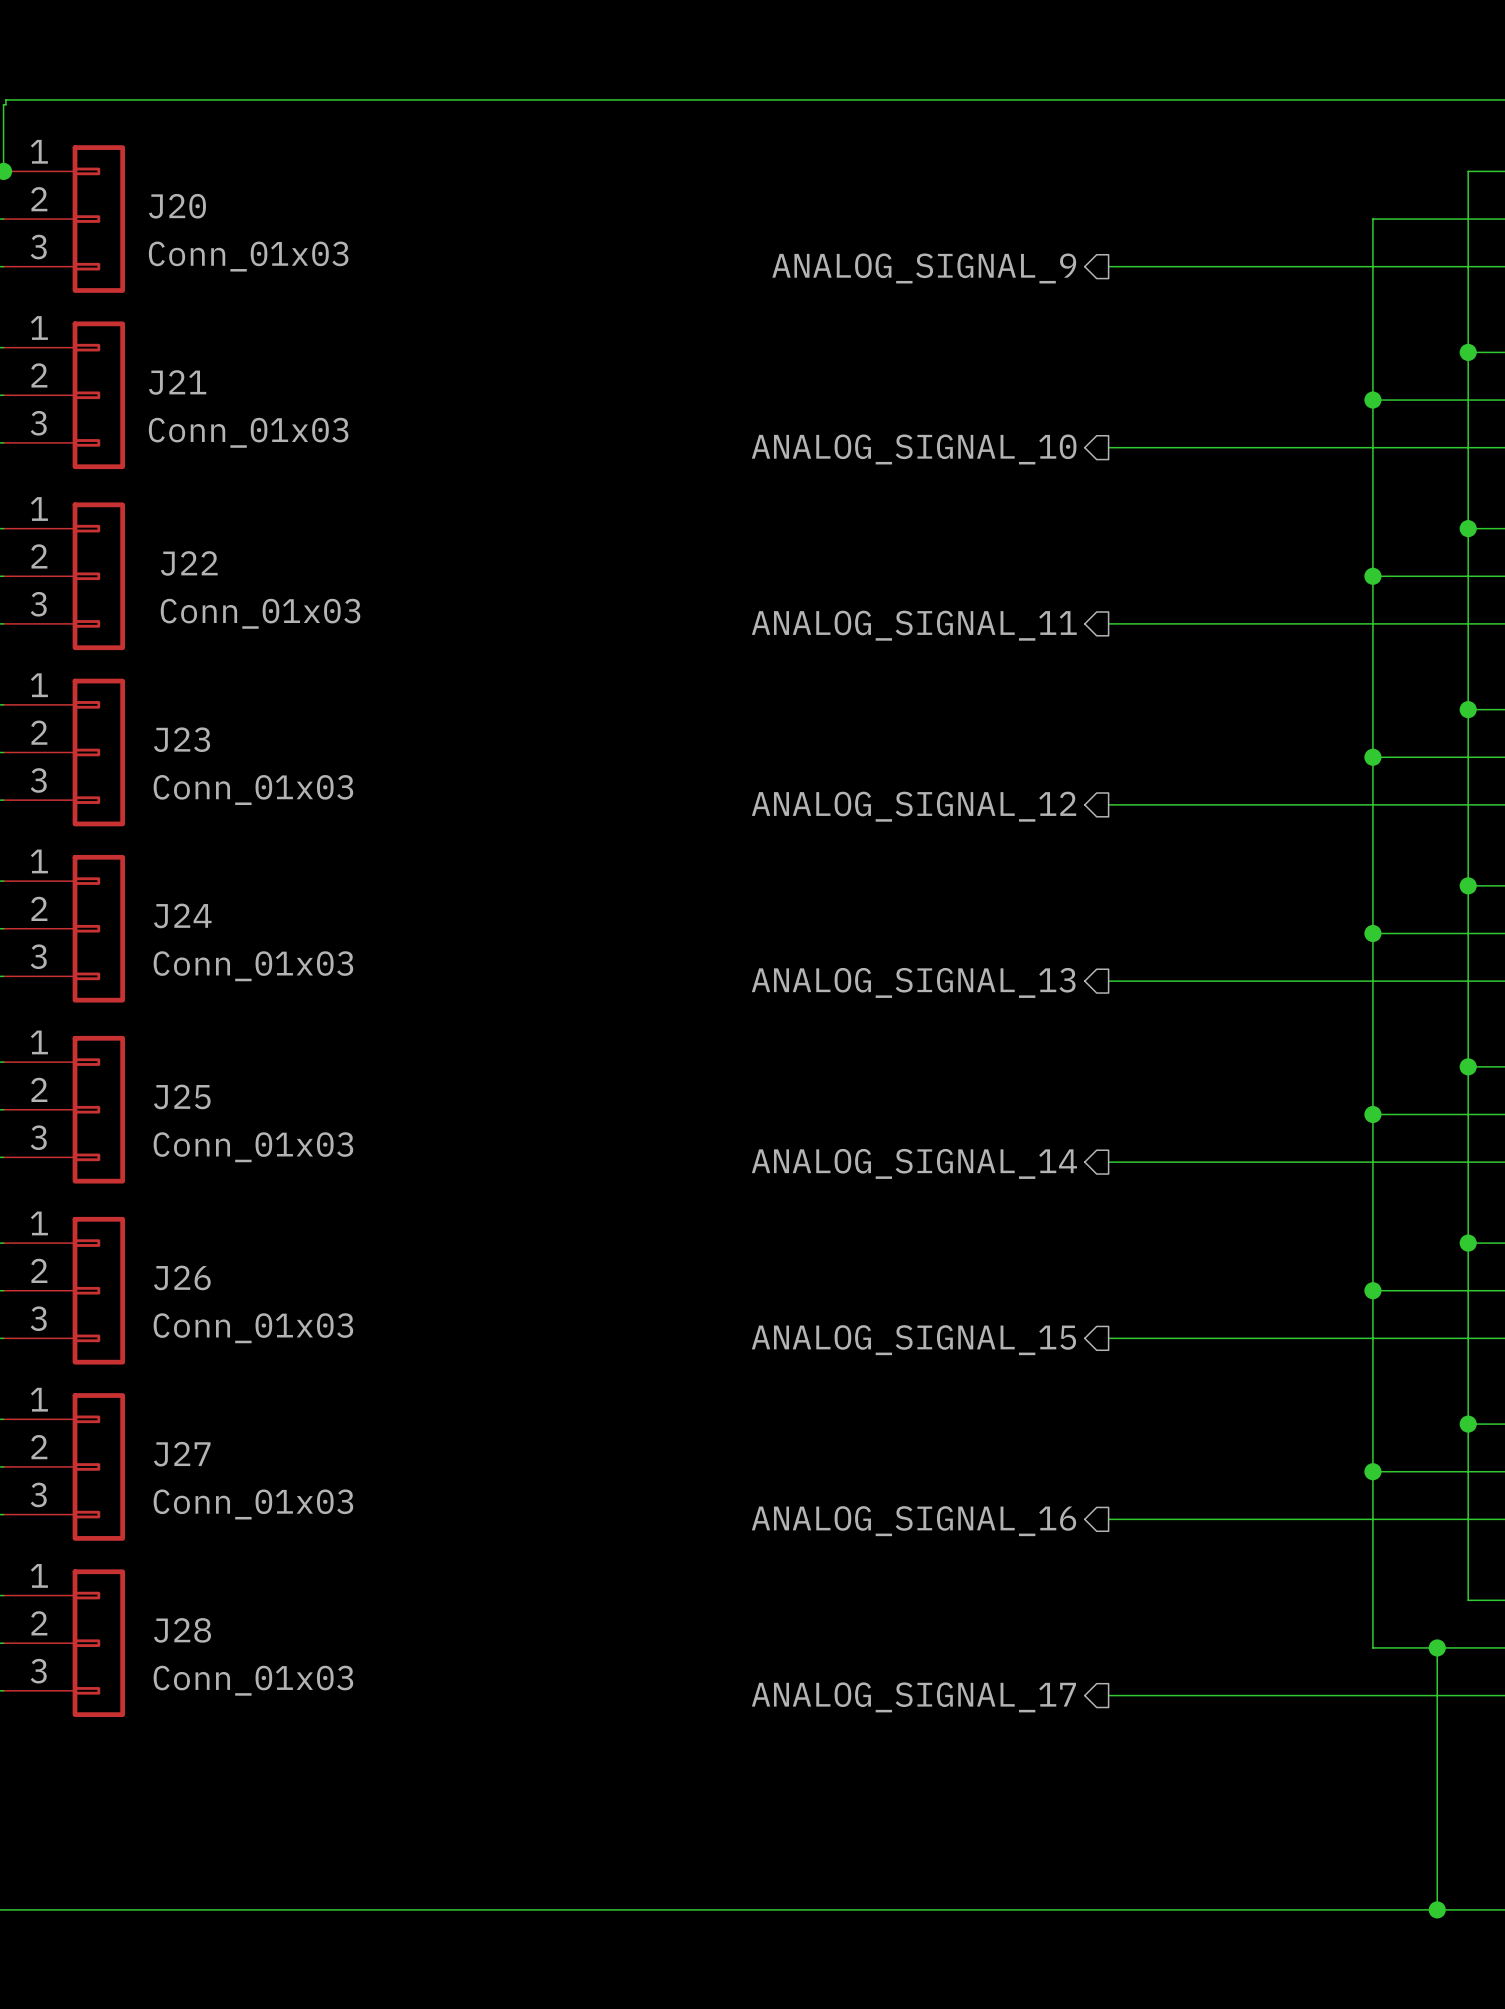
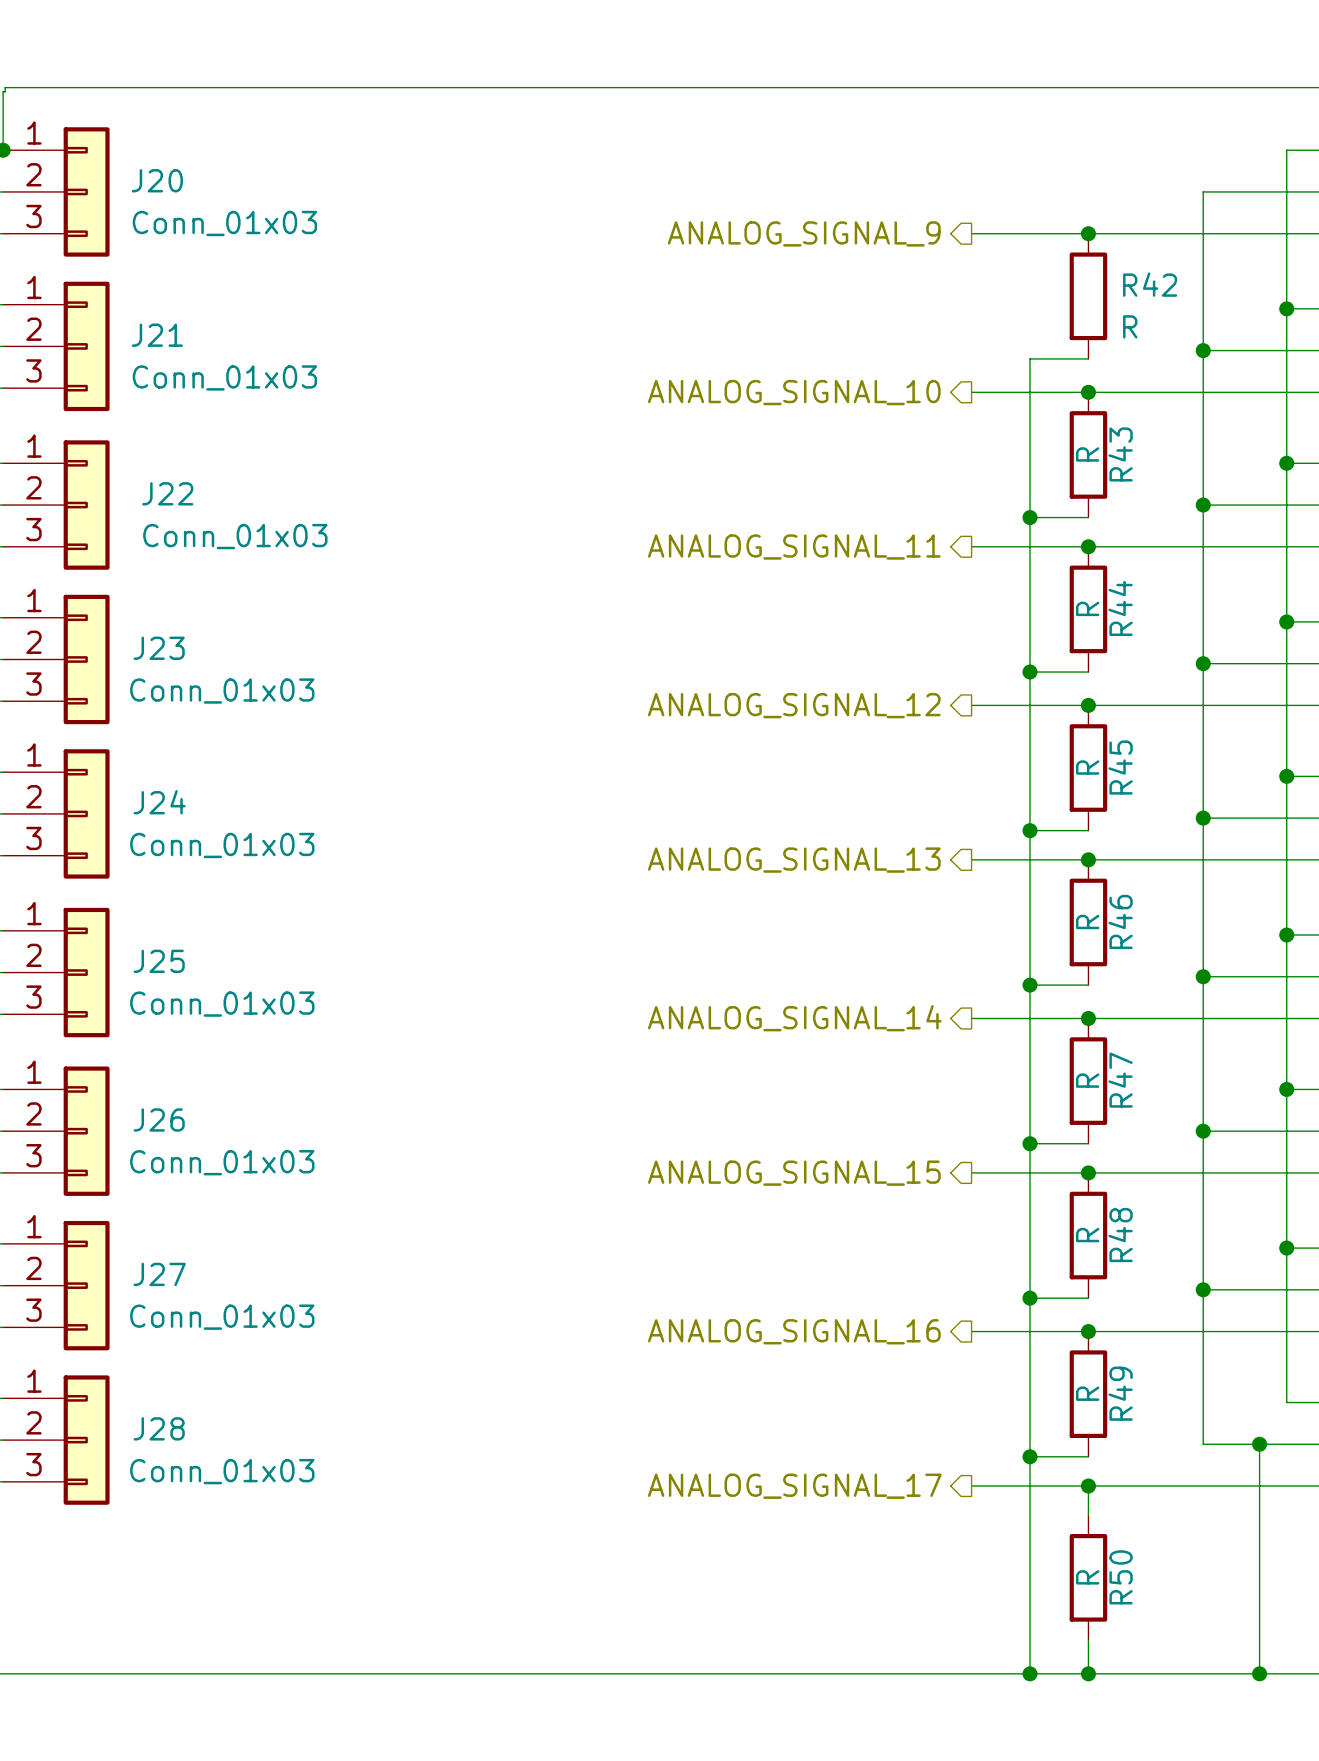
junction: none -> (1088, 233)
R42: none -> R (1088, 296)
wire: none -> (1088, 358) (1030, 358) (1030, 1673)
junction: none -> (1088, 392)
R43: none -> R (1088, 454)
wire: none -> (1030, 517) (1088, 517)
junction: none -> (1030, 517)
junction: none -> (1088, 546)
R44: none -> R (1088, 609)
wire: none -> (1030, 672) (1088, 672)
junction: none -> (1030, 672)
junction: none -> (1088, 705)
R45: none -> R (1088, 768)
wire: none -> (1030, 830) (1088, 830)
junction: none -> (1030, 830)
junction: none -> (1088, 859)
R46: none -> R (1088, 922)
wire: none -> (1030, 985) (1088, 985)
junction: none -> (1030, 985)
junction: none -> (1088, 1018)
R47: none -> R (1088, 1081)
wire: none -> (1030, 1143) (1088, 1143)
junction: none -> (1030, 1143)
junction: none -> (1088, 1172)
R48: none -> R (1088, 1235)
wire: none -> (1030, 1298) (1088, 1298)
junction: none -> (1030, 1298)
junction: none -> (1088, 1331)
R49: none -> R (1088, 1394)
wire: none -> (1030, 1456) (1088, 1456)
junction: none -> (1030, 1456)
wire: none -> (1088, 1486) (1088, 1515)
junction: none -> (1088, 1486)
R50: none -> R (1088, 1577)
wire: none -> (1088, 1640) (1088, 1673)
junction: none -> (1030, 1673)
junction: none -> (1088, 1673)

